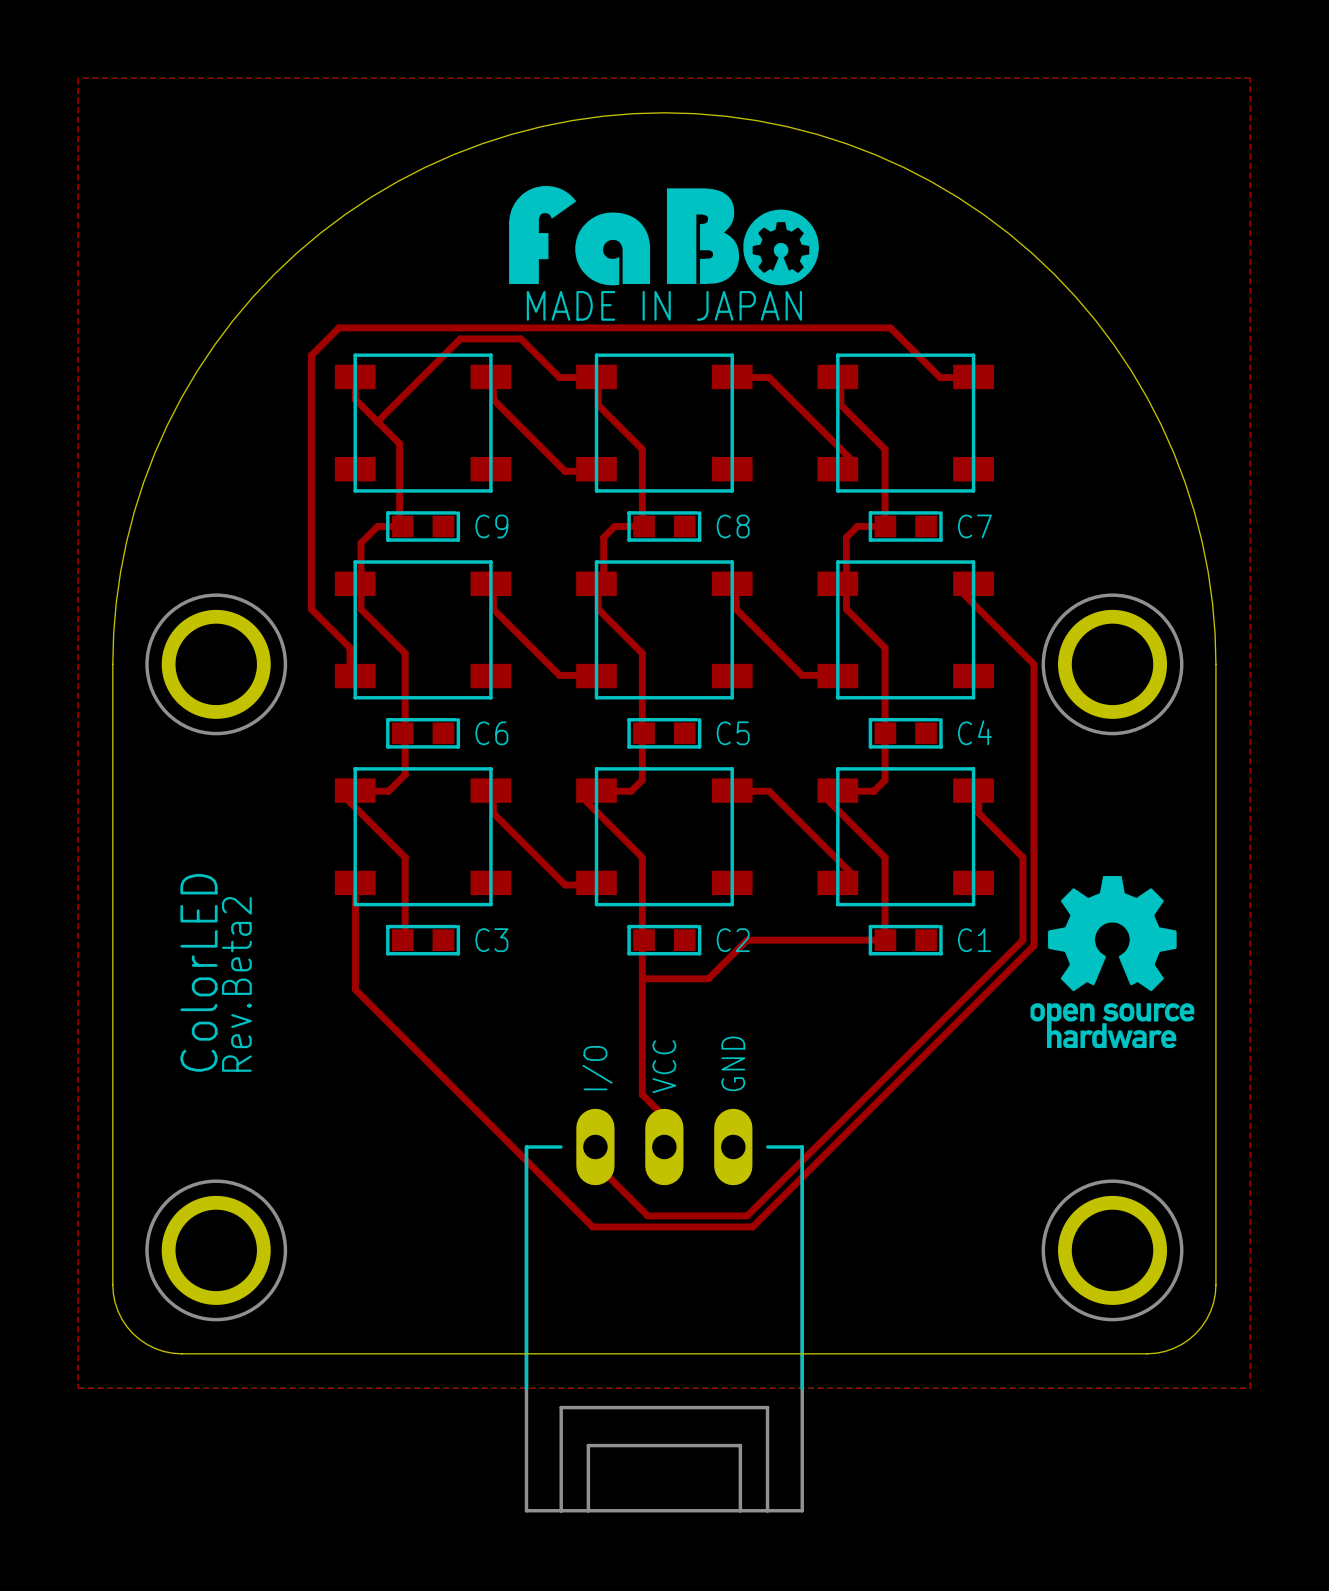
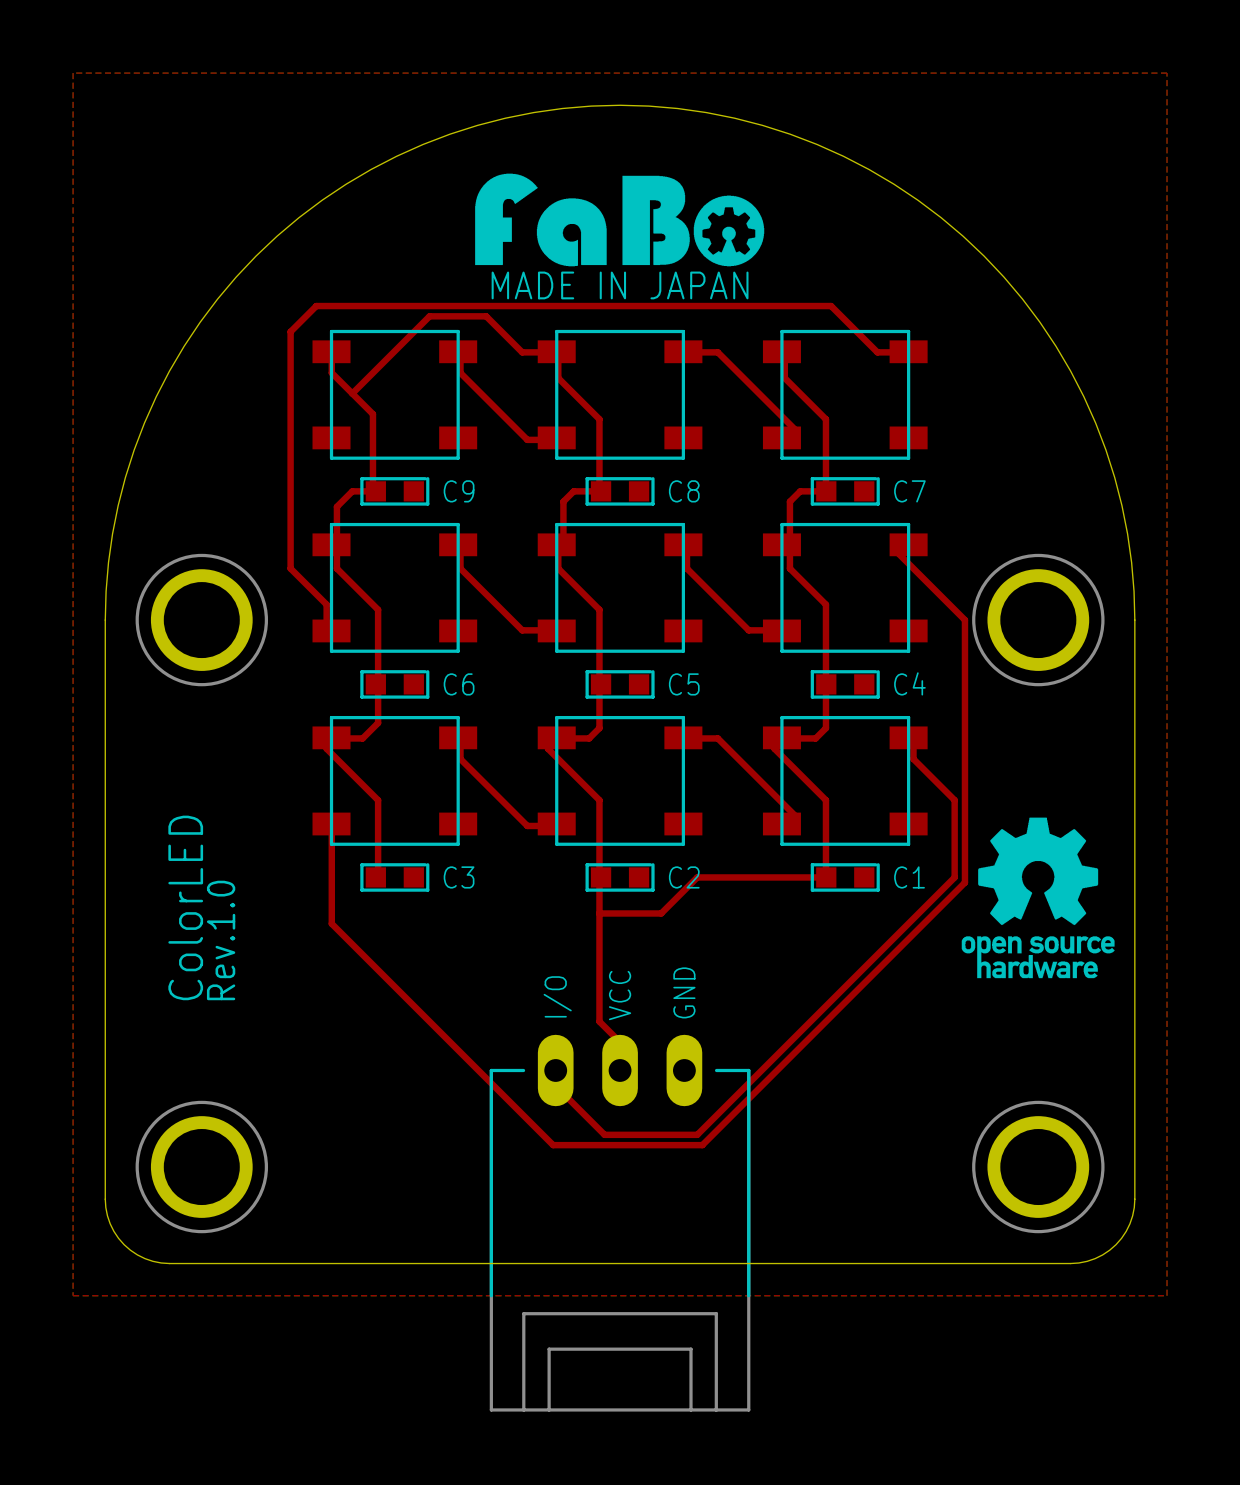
text: Rev.Beta2 (236, 984) -> Rev.1.0 (221, 940)

